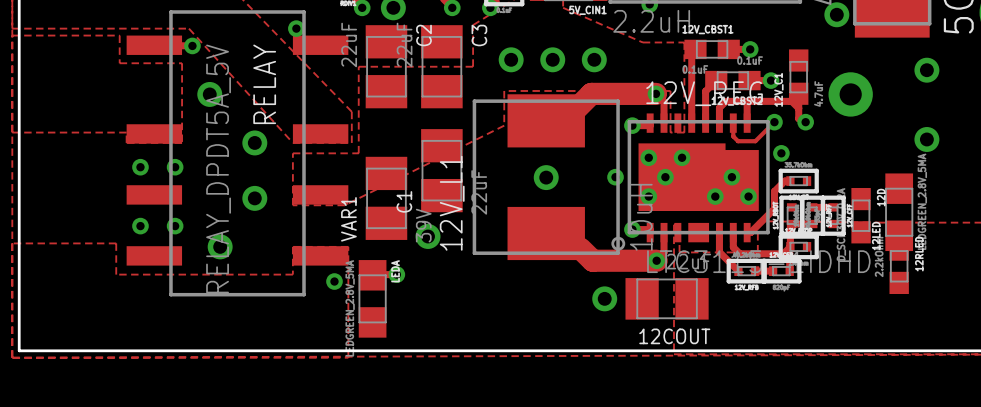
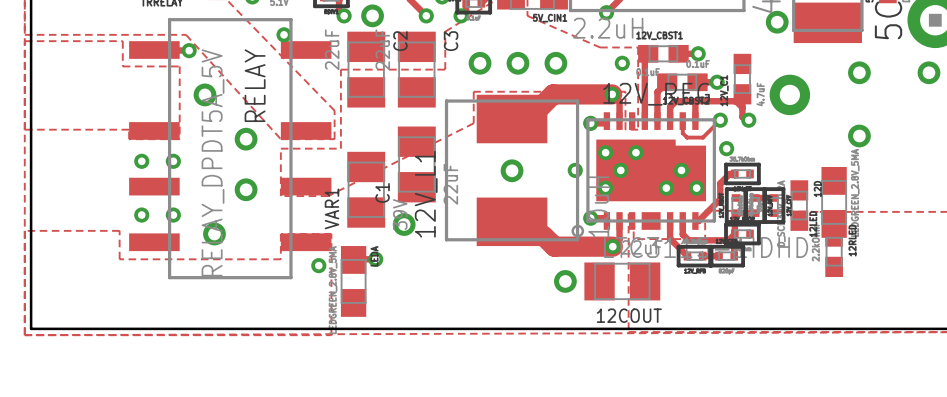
via: none -> (622, 63)

